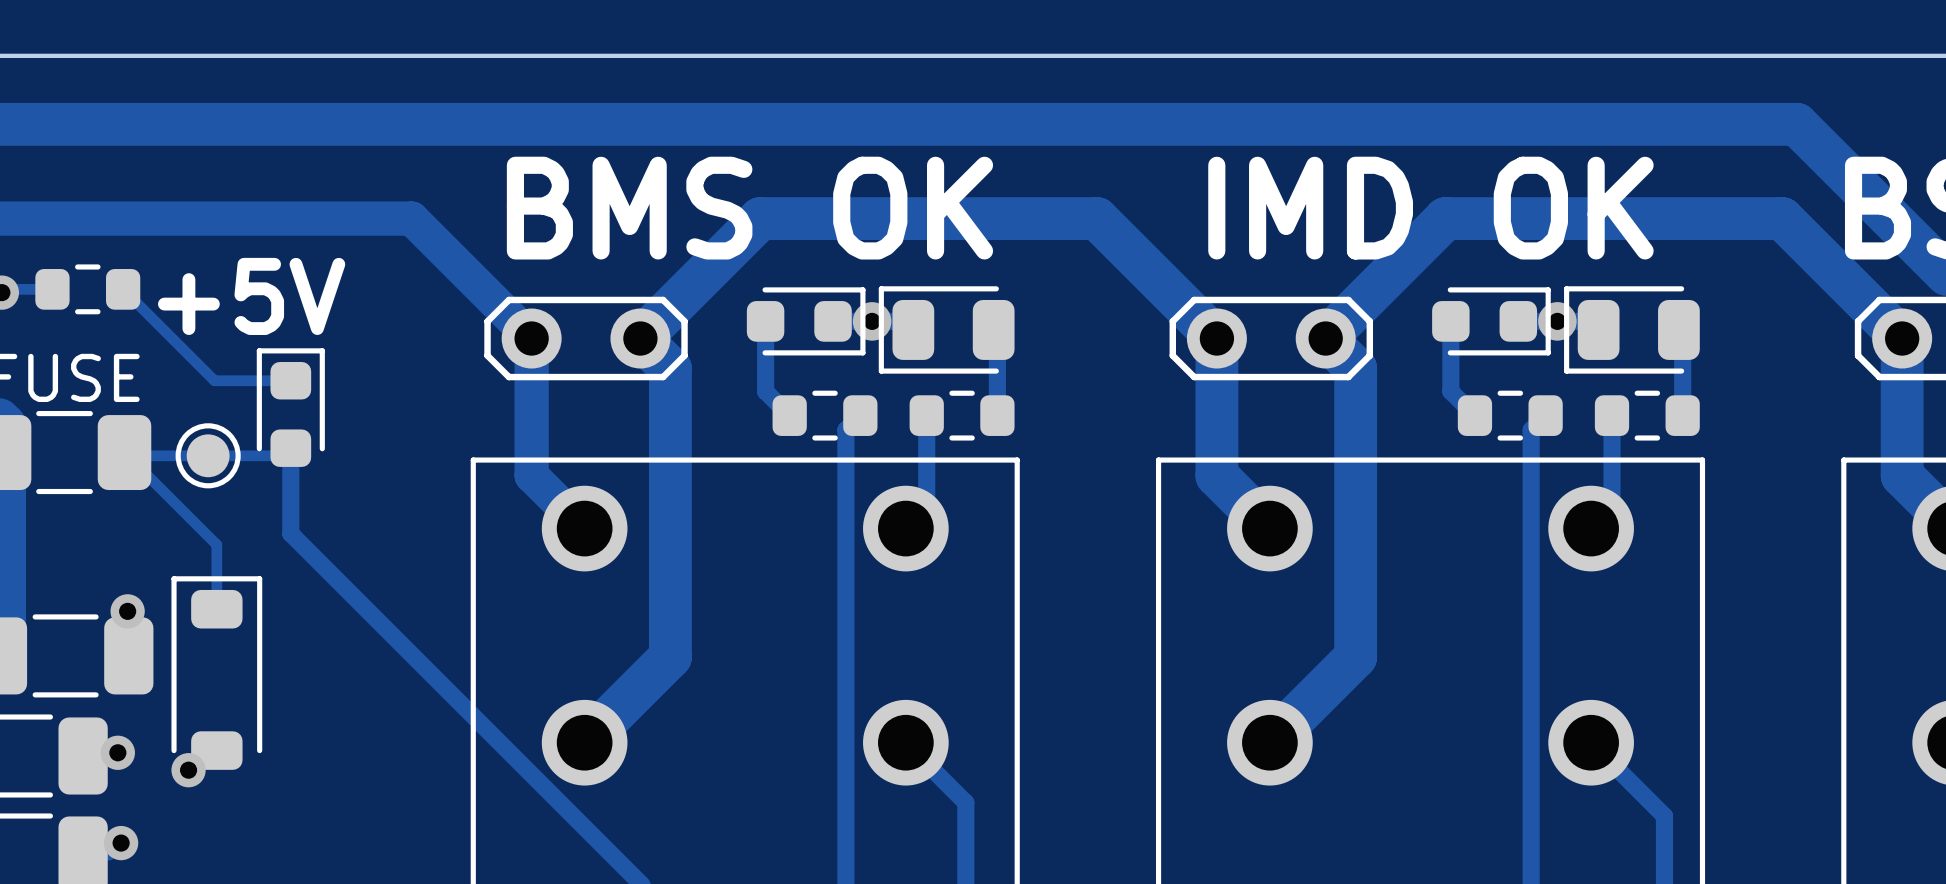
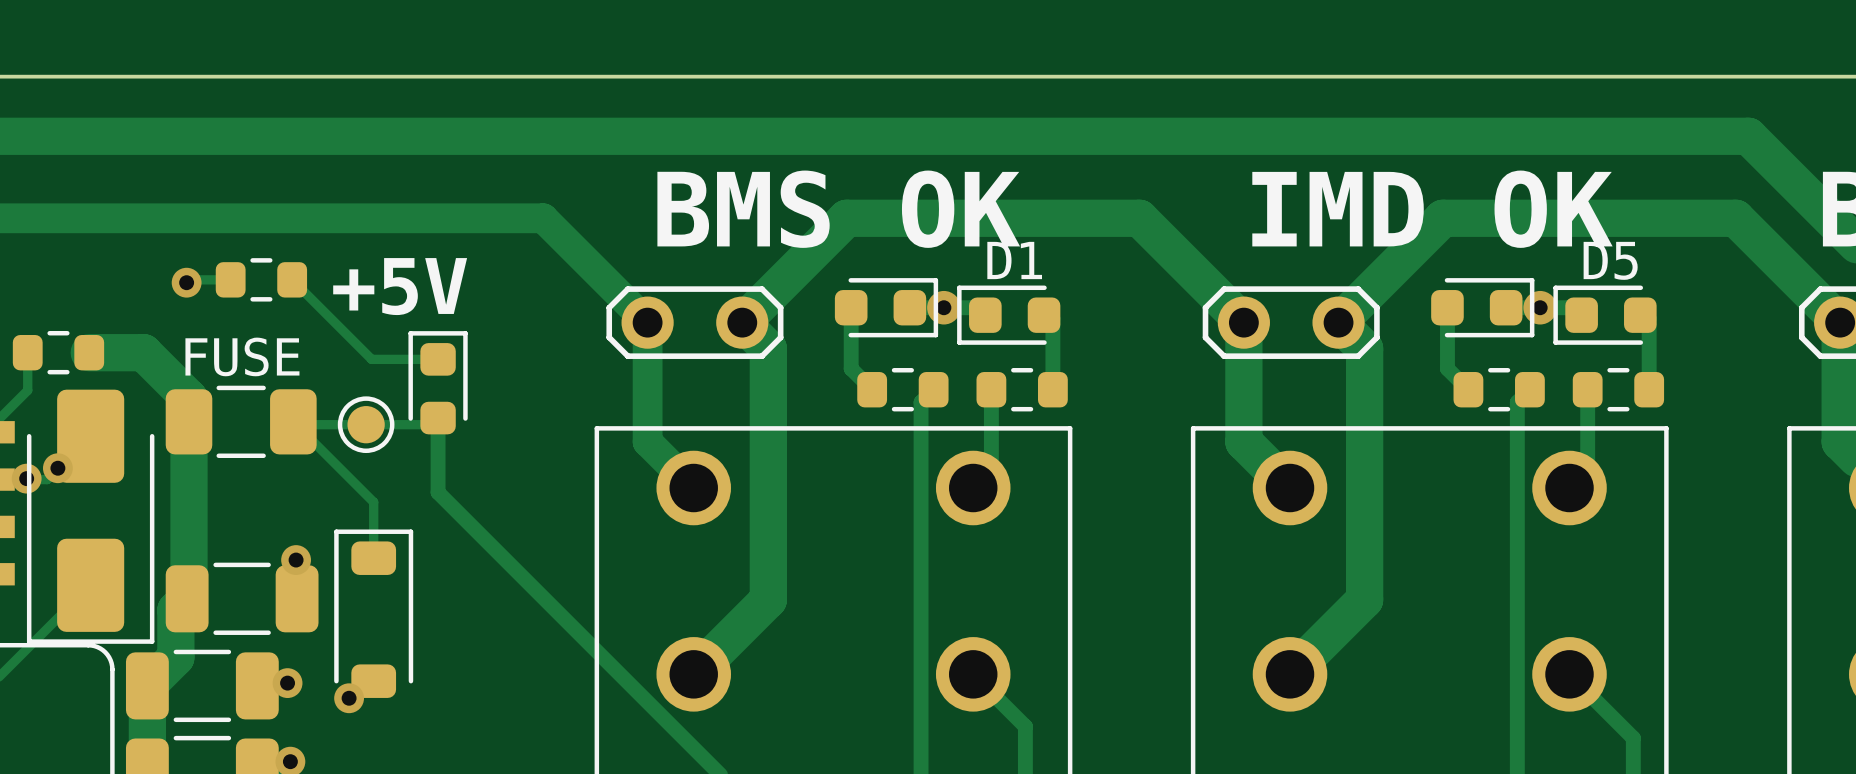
part: (946, 329) -> none
D1: none -> (1008, 315)
part: (1631, 329) -> none
D5: none -> (1605, 315)

